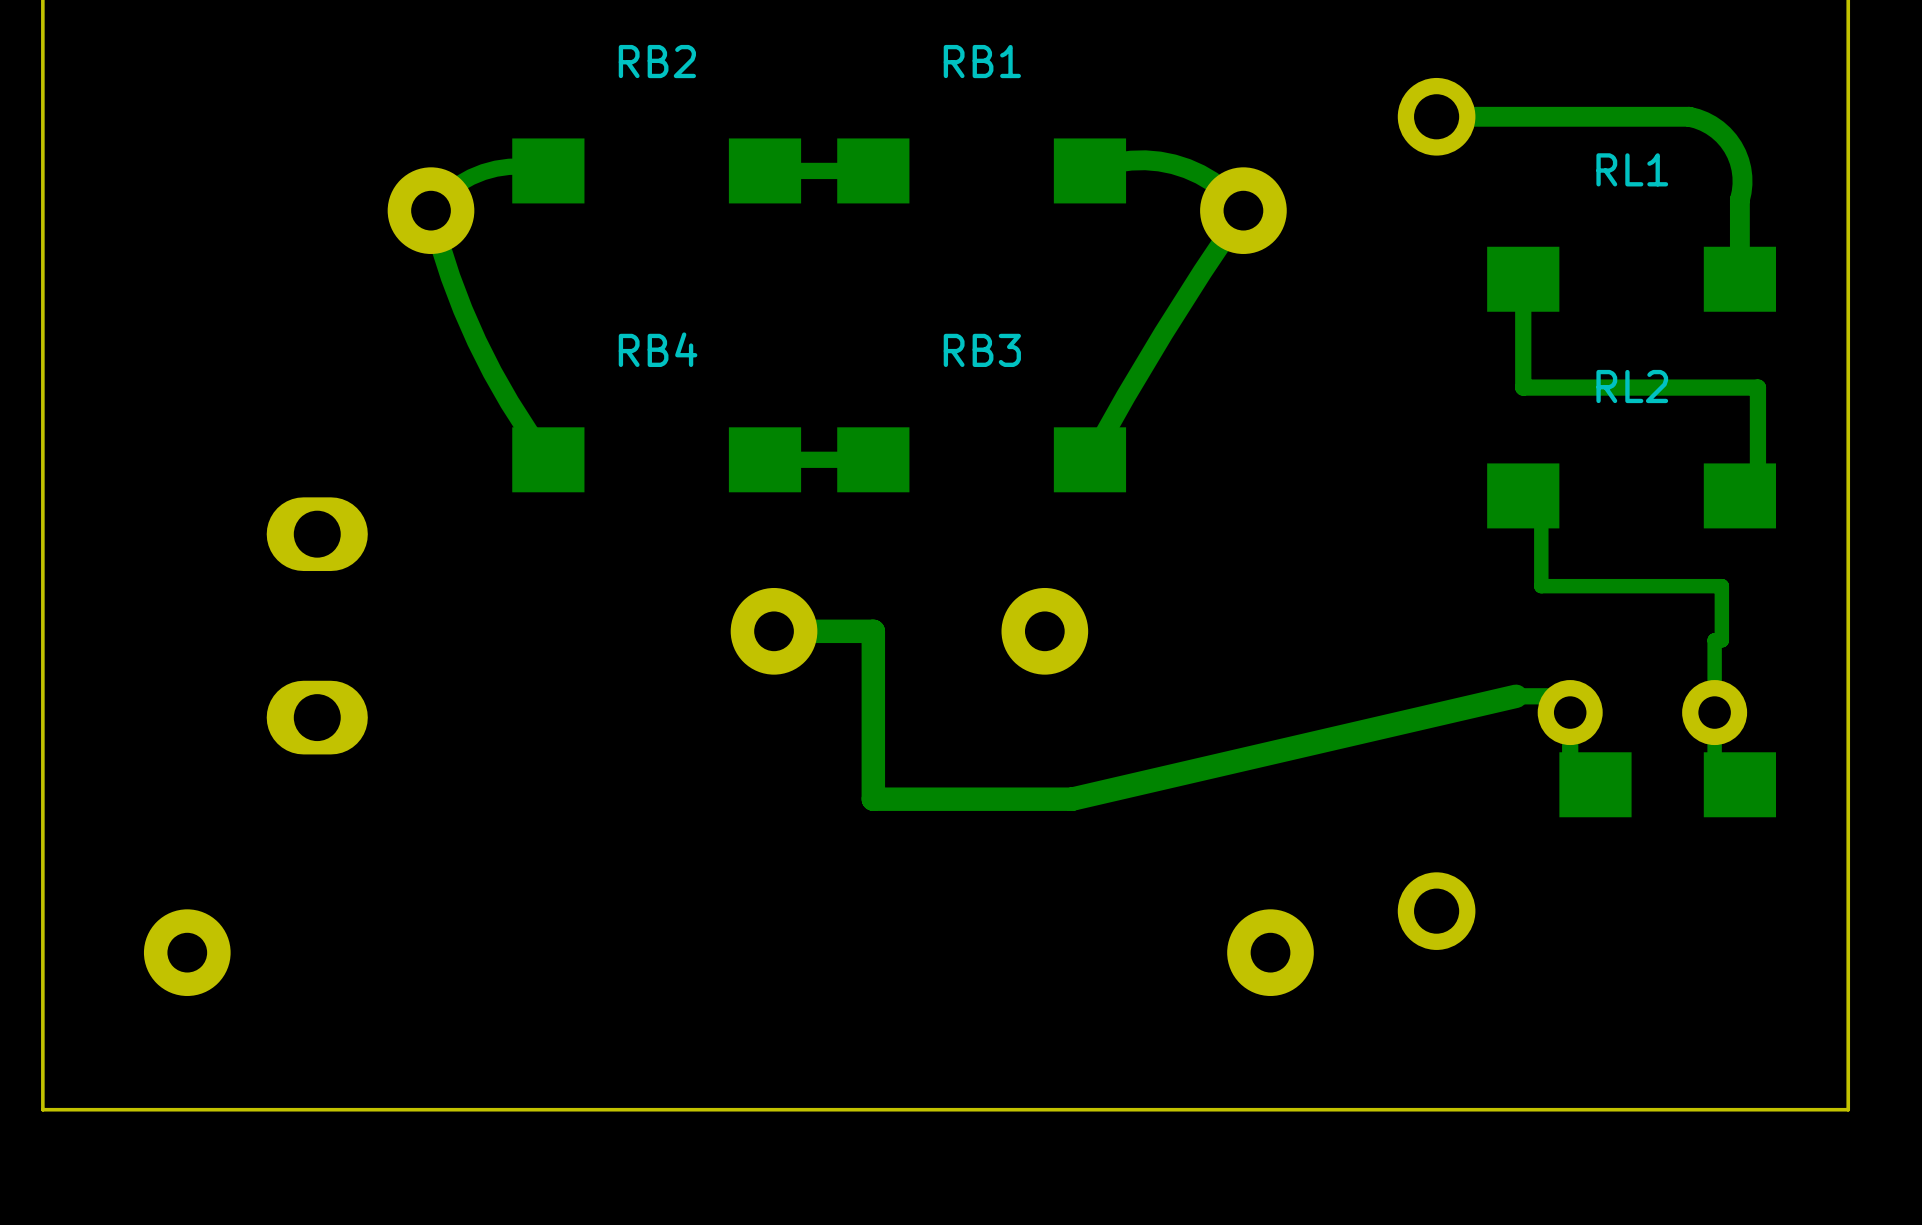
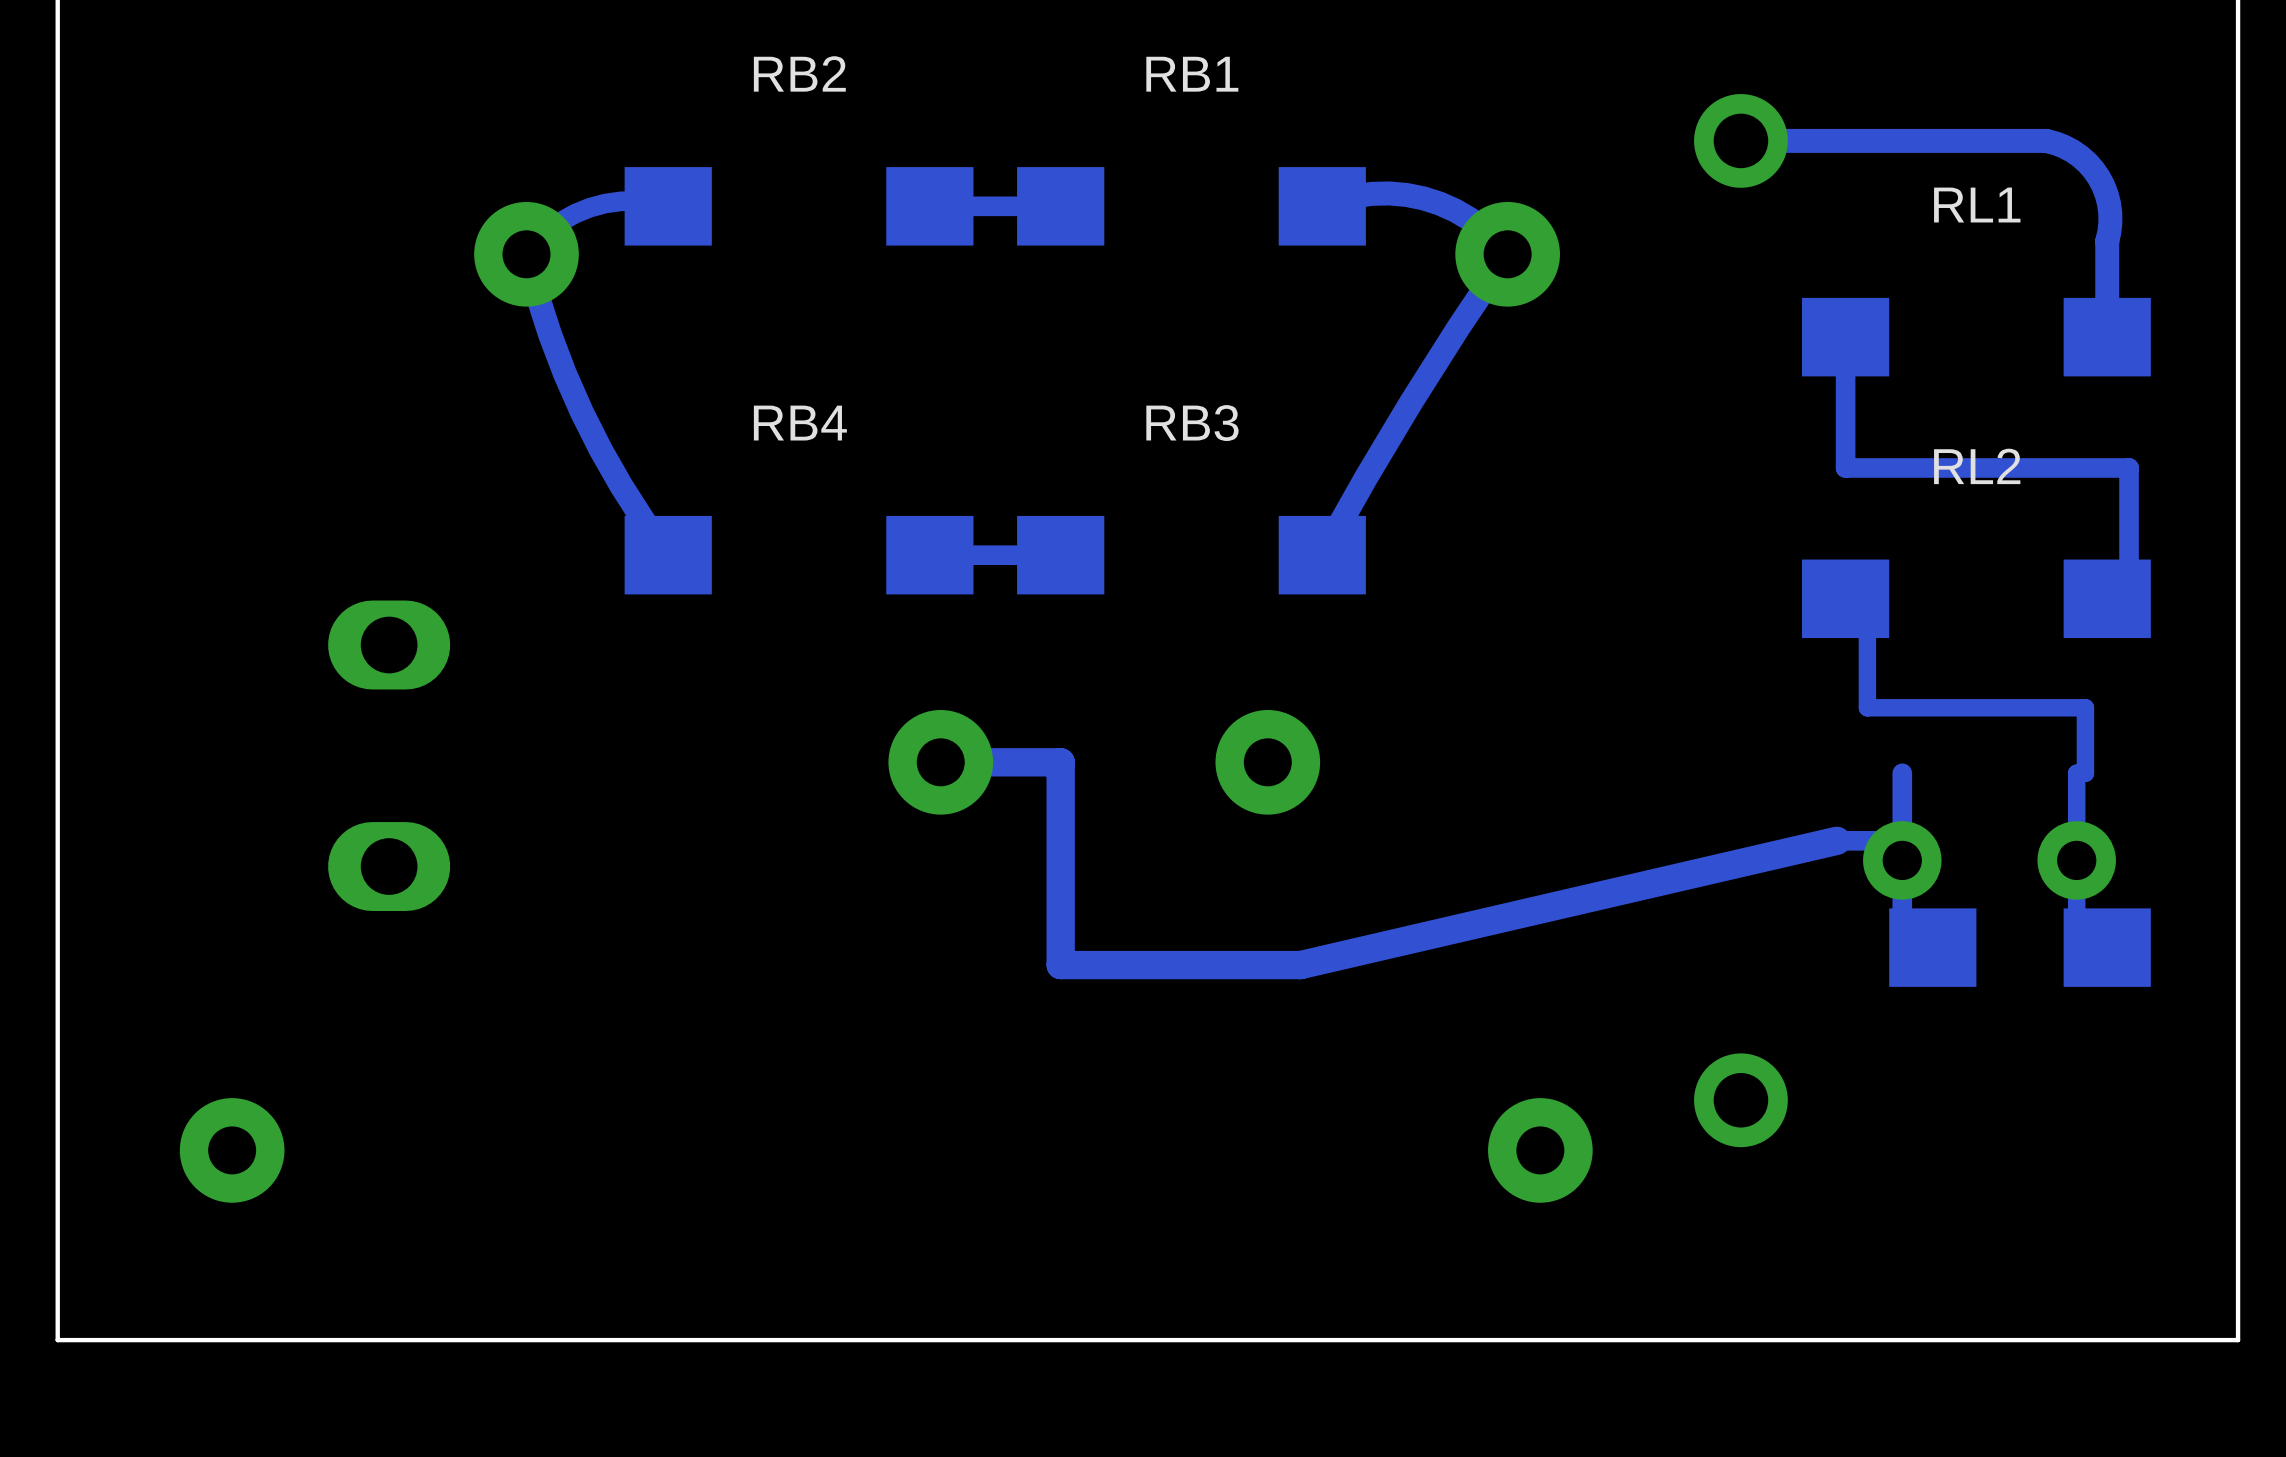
track: none -> (1902, 773) (1902, 840)

